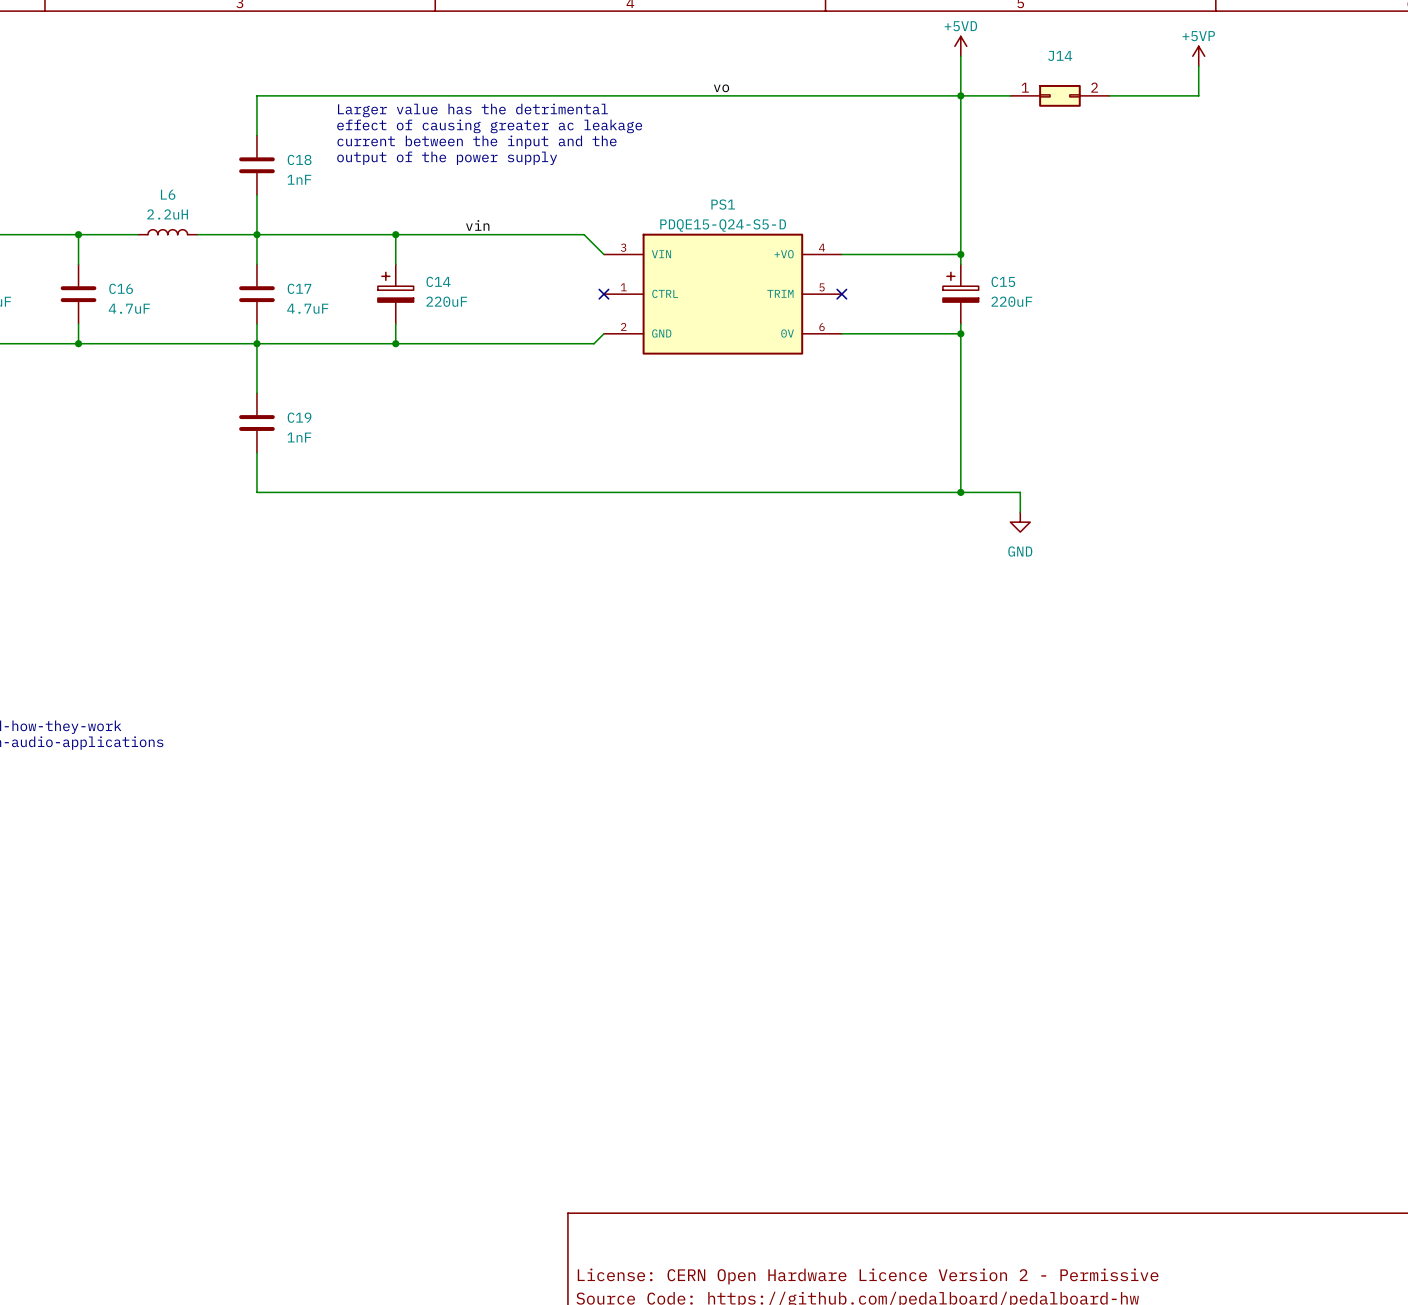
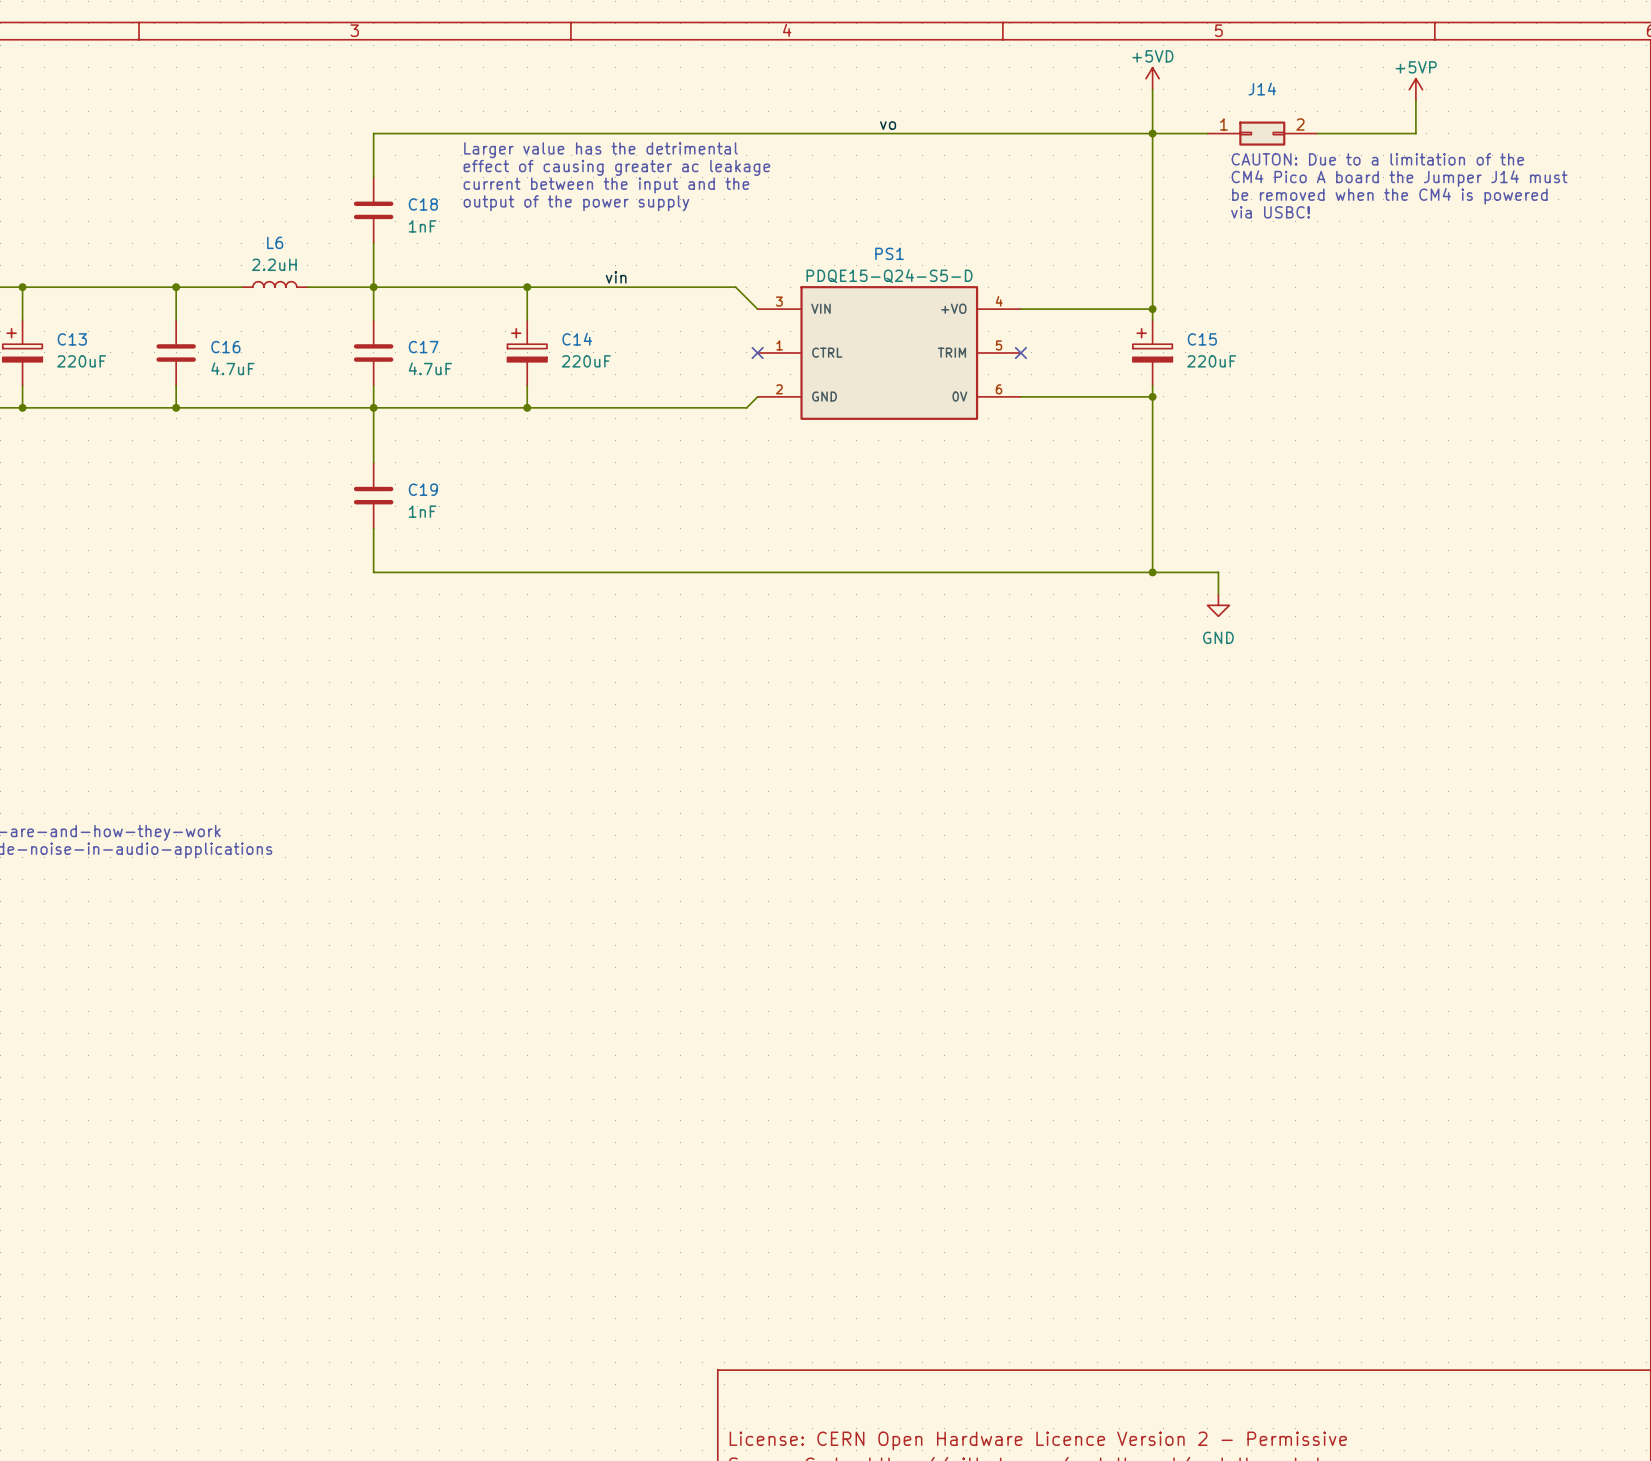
text: none -> CAUTON: Due to a limitation of the (1377, 159)
text: none -> CM4 Pico A board the Jumper J14 must (1399, 178)
text: none -> be removed when the CM4 is powered (1389, 196)
text: none -> via USBC! (1270, 212)

